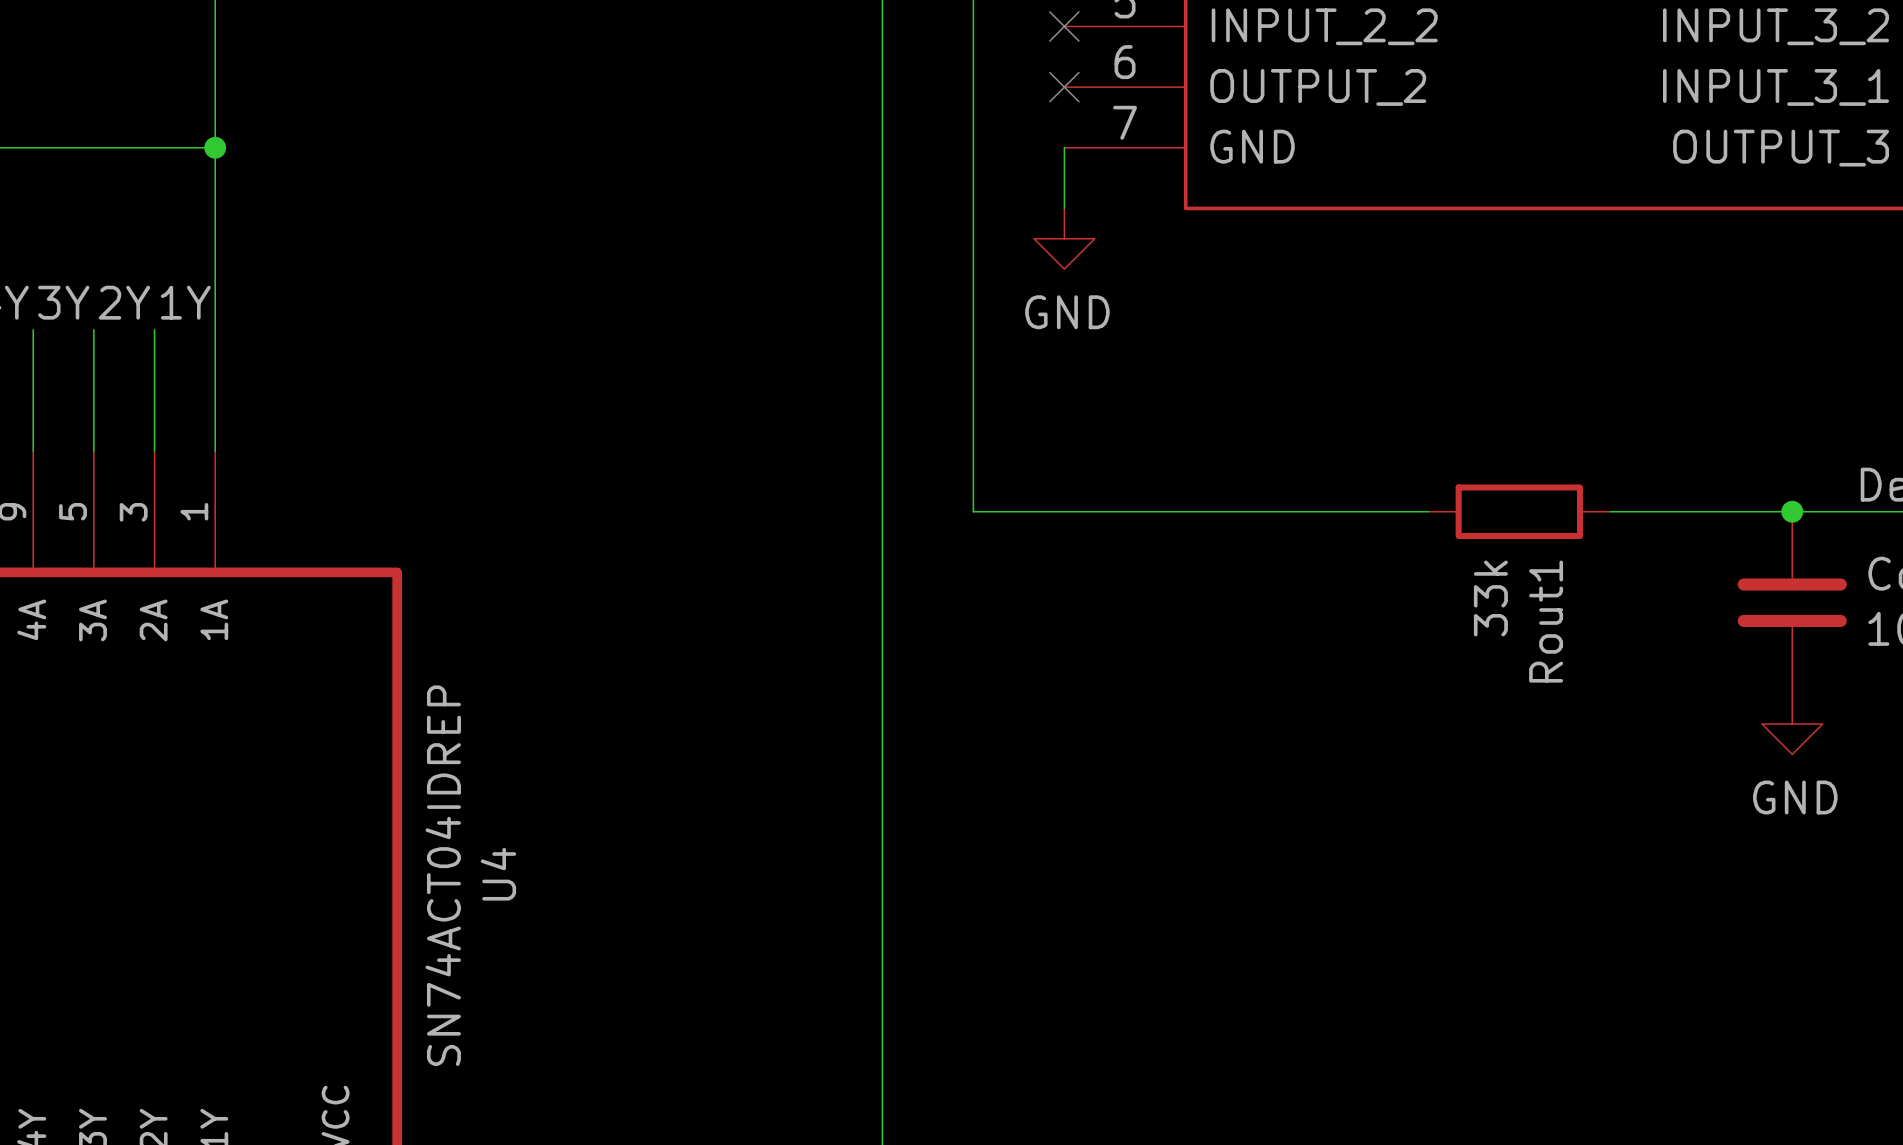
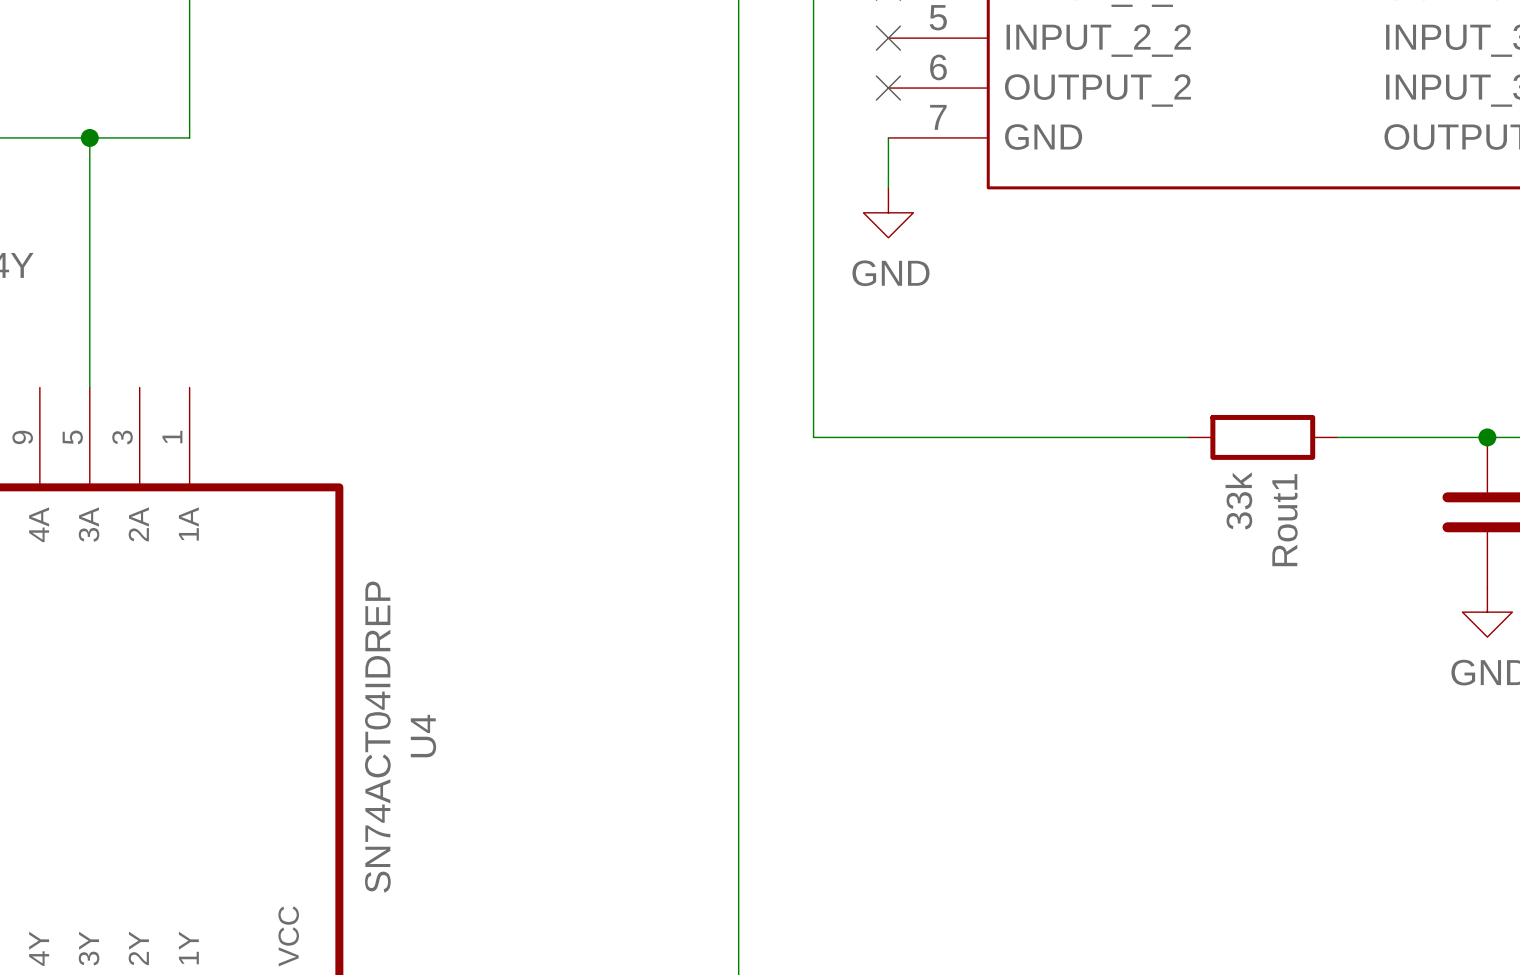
wire: none -> (89, 137) (89, 287)
wire: (215, 147) (215, 451) -> none
junction position: (215, 147) -> (89, 137)
label: 3Y (63, 302) -> none
label: 2Y (124, 302) -> none
label: 1Y (185, 302) -> none
wire: (33, 329) (33, 451) -> none
wire: (154, 329) (154, 451) -> none

